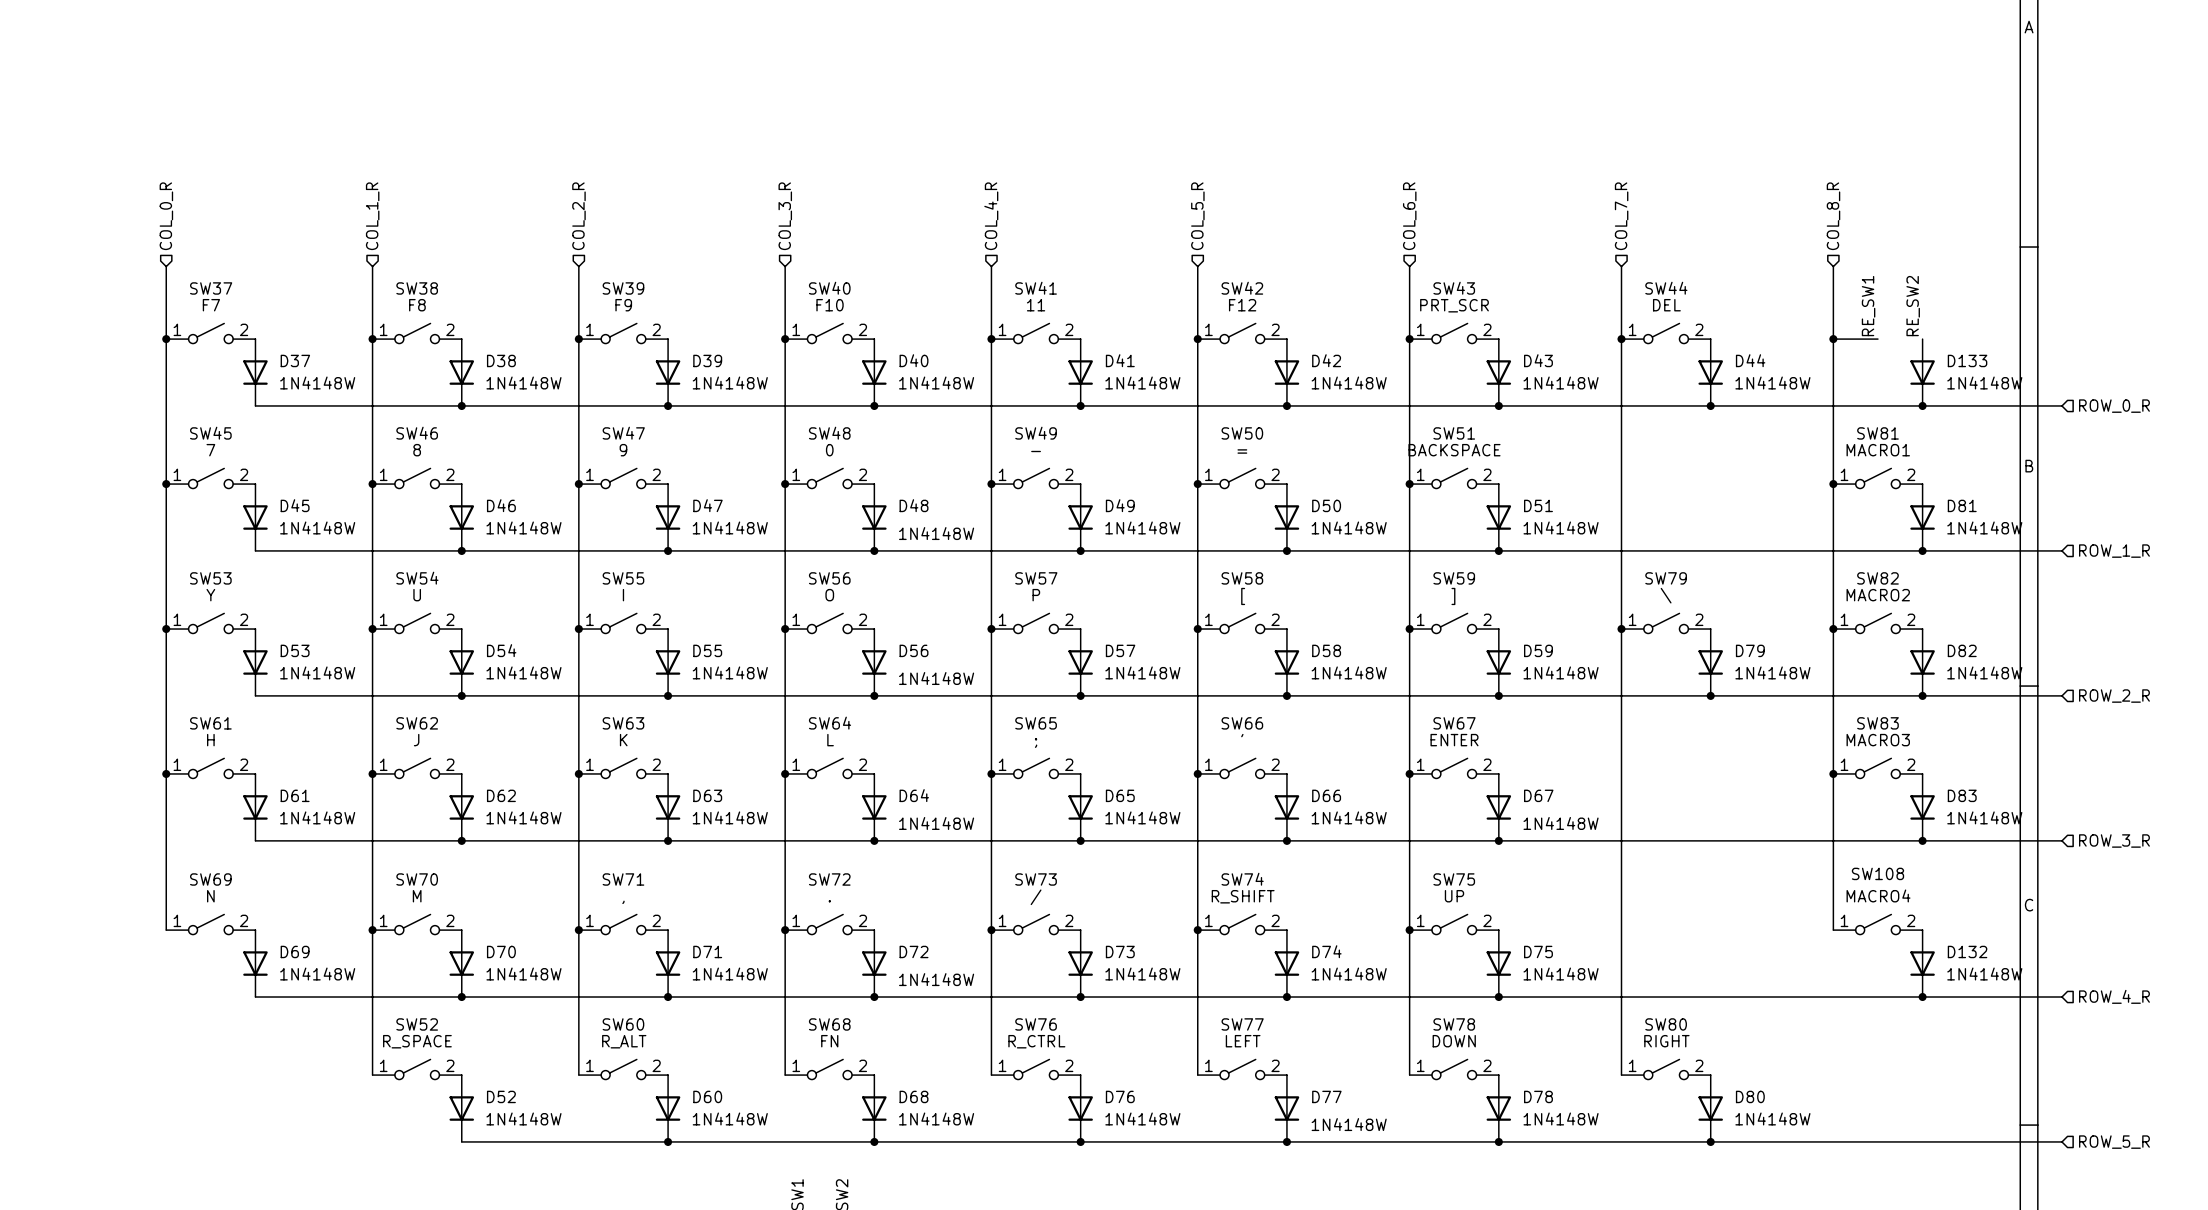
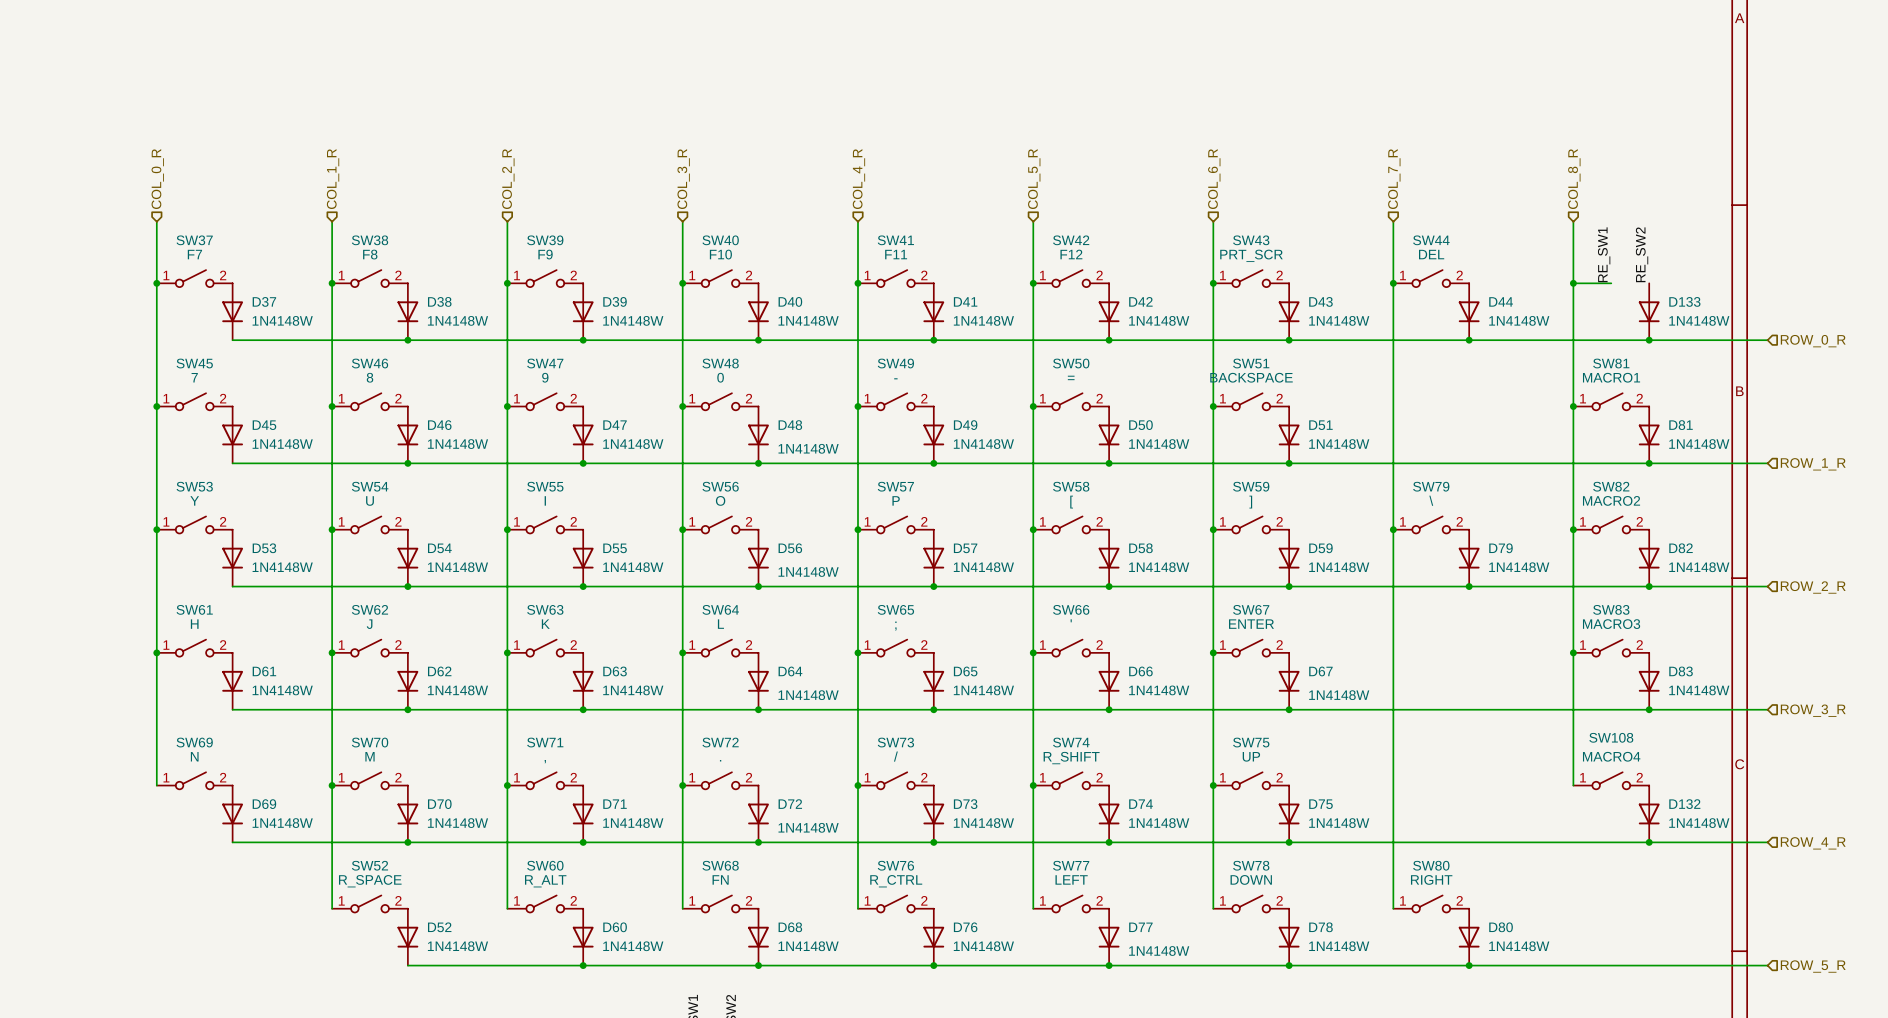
SW41 value: 11 (1036, 305) -> F11 (896, 254)

